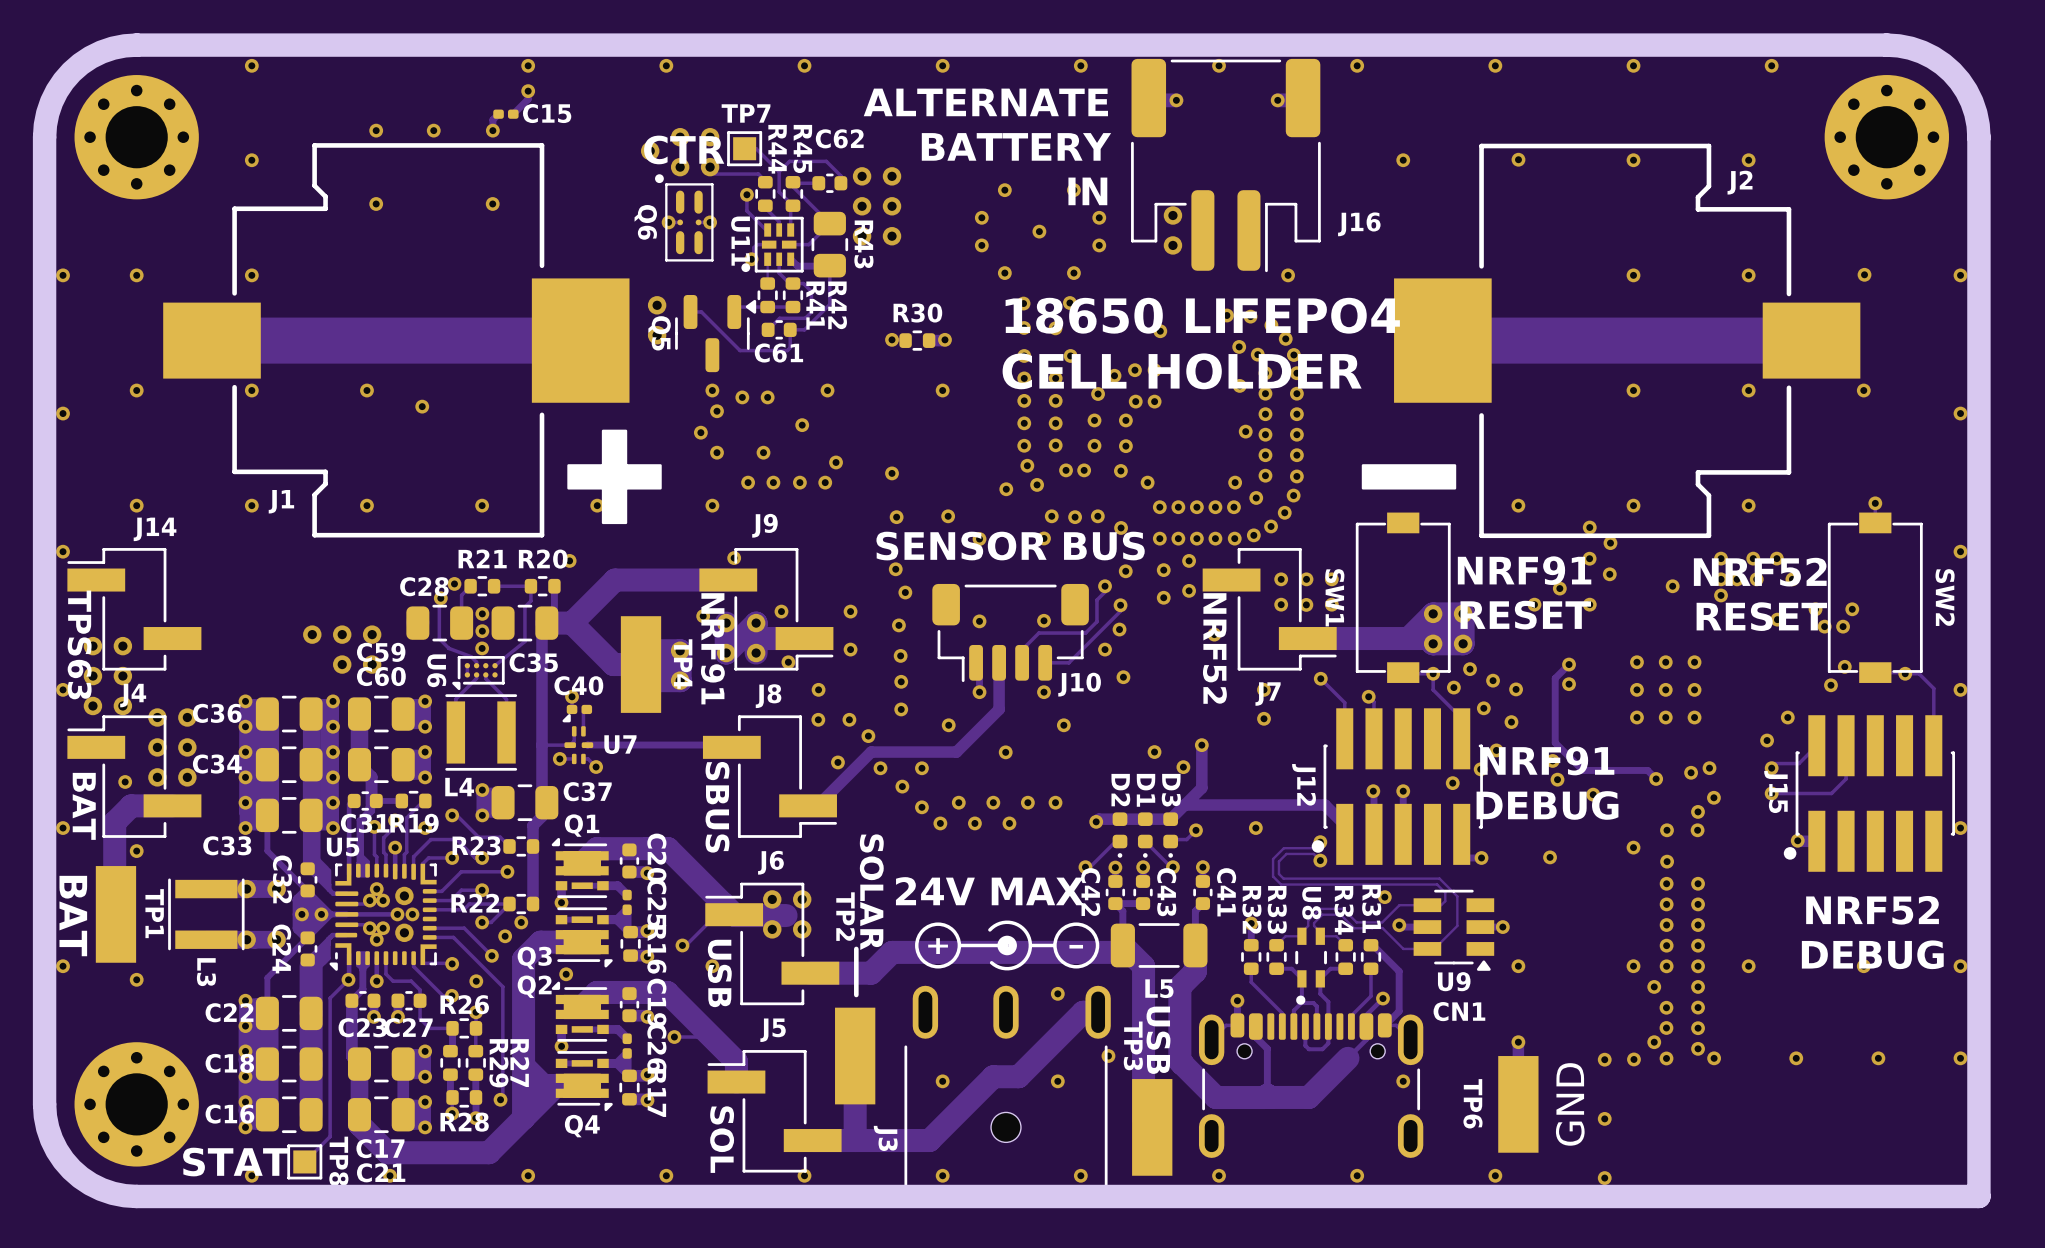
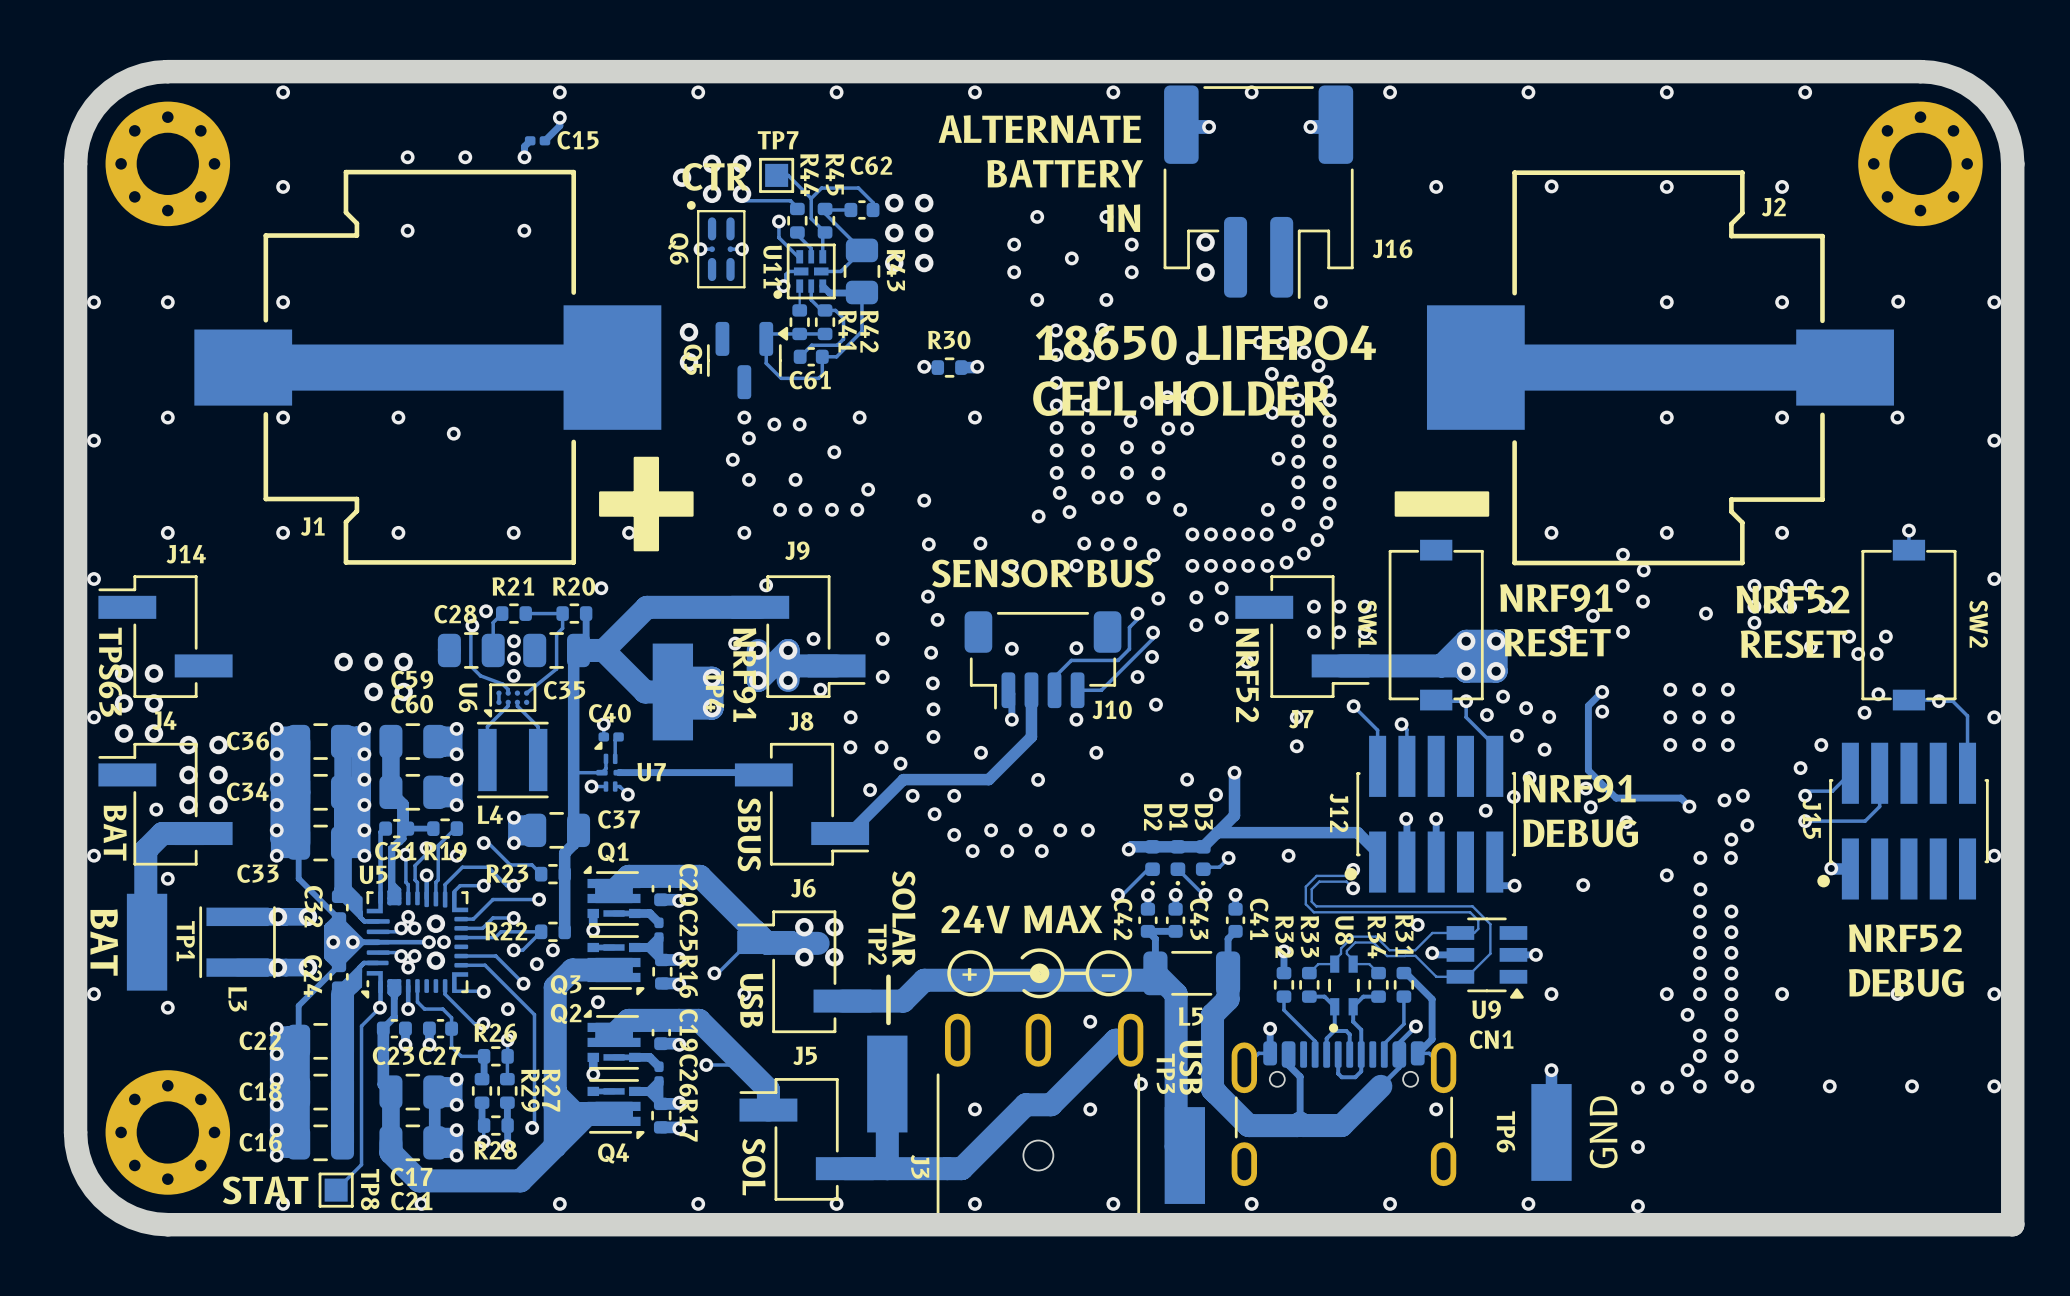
track: (690, 311) (701, 311) (740, 350) (787, 350) -> (766, 338) (766, 363) (781, 378) (819, 377)

